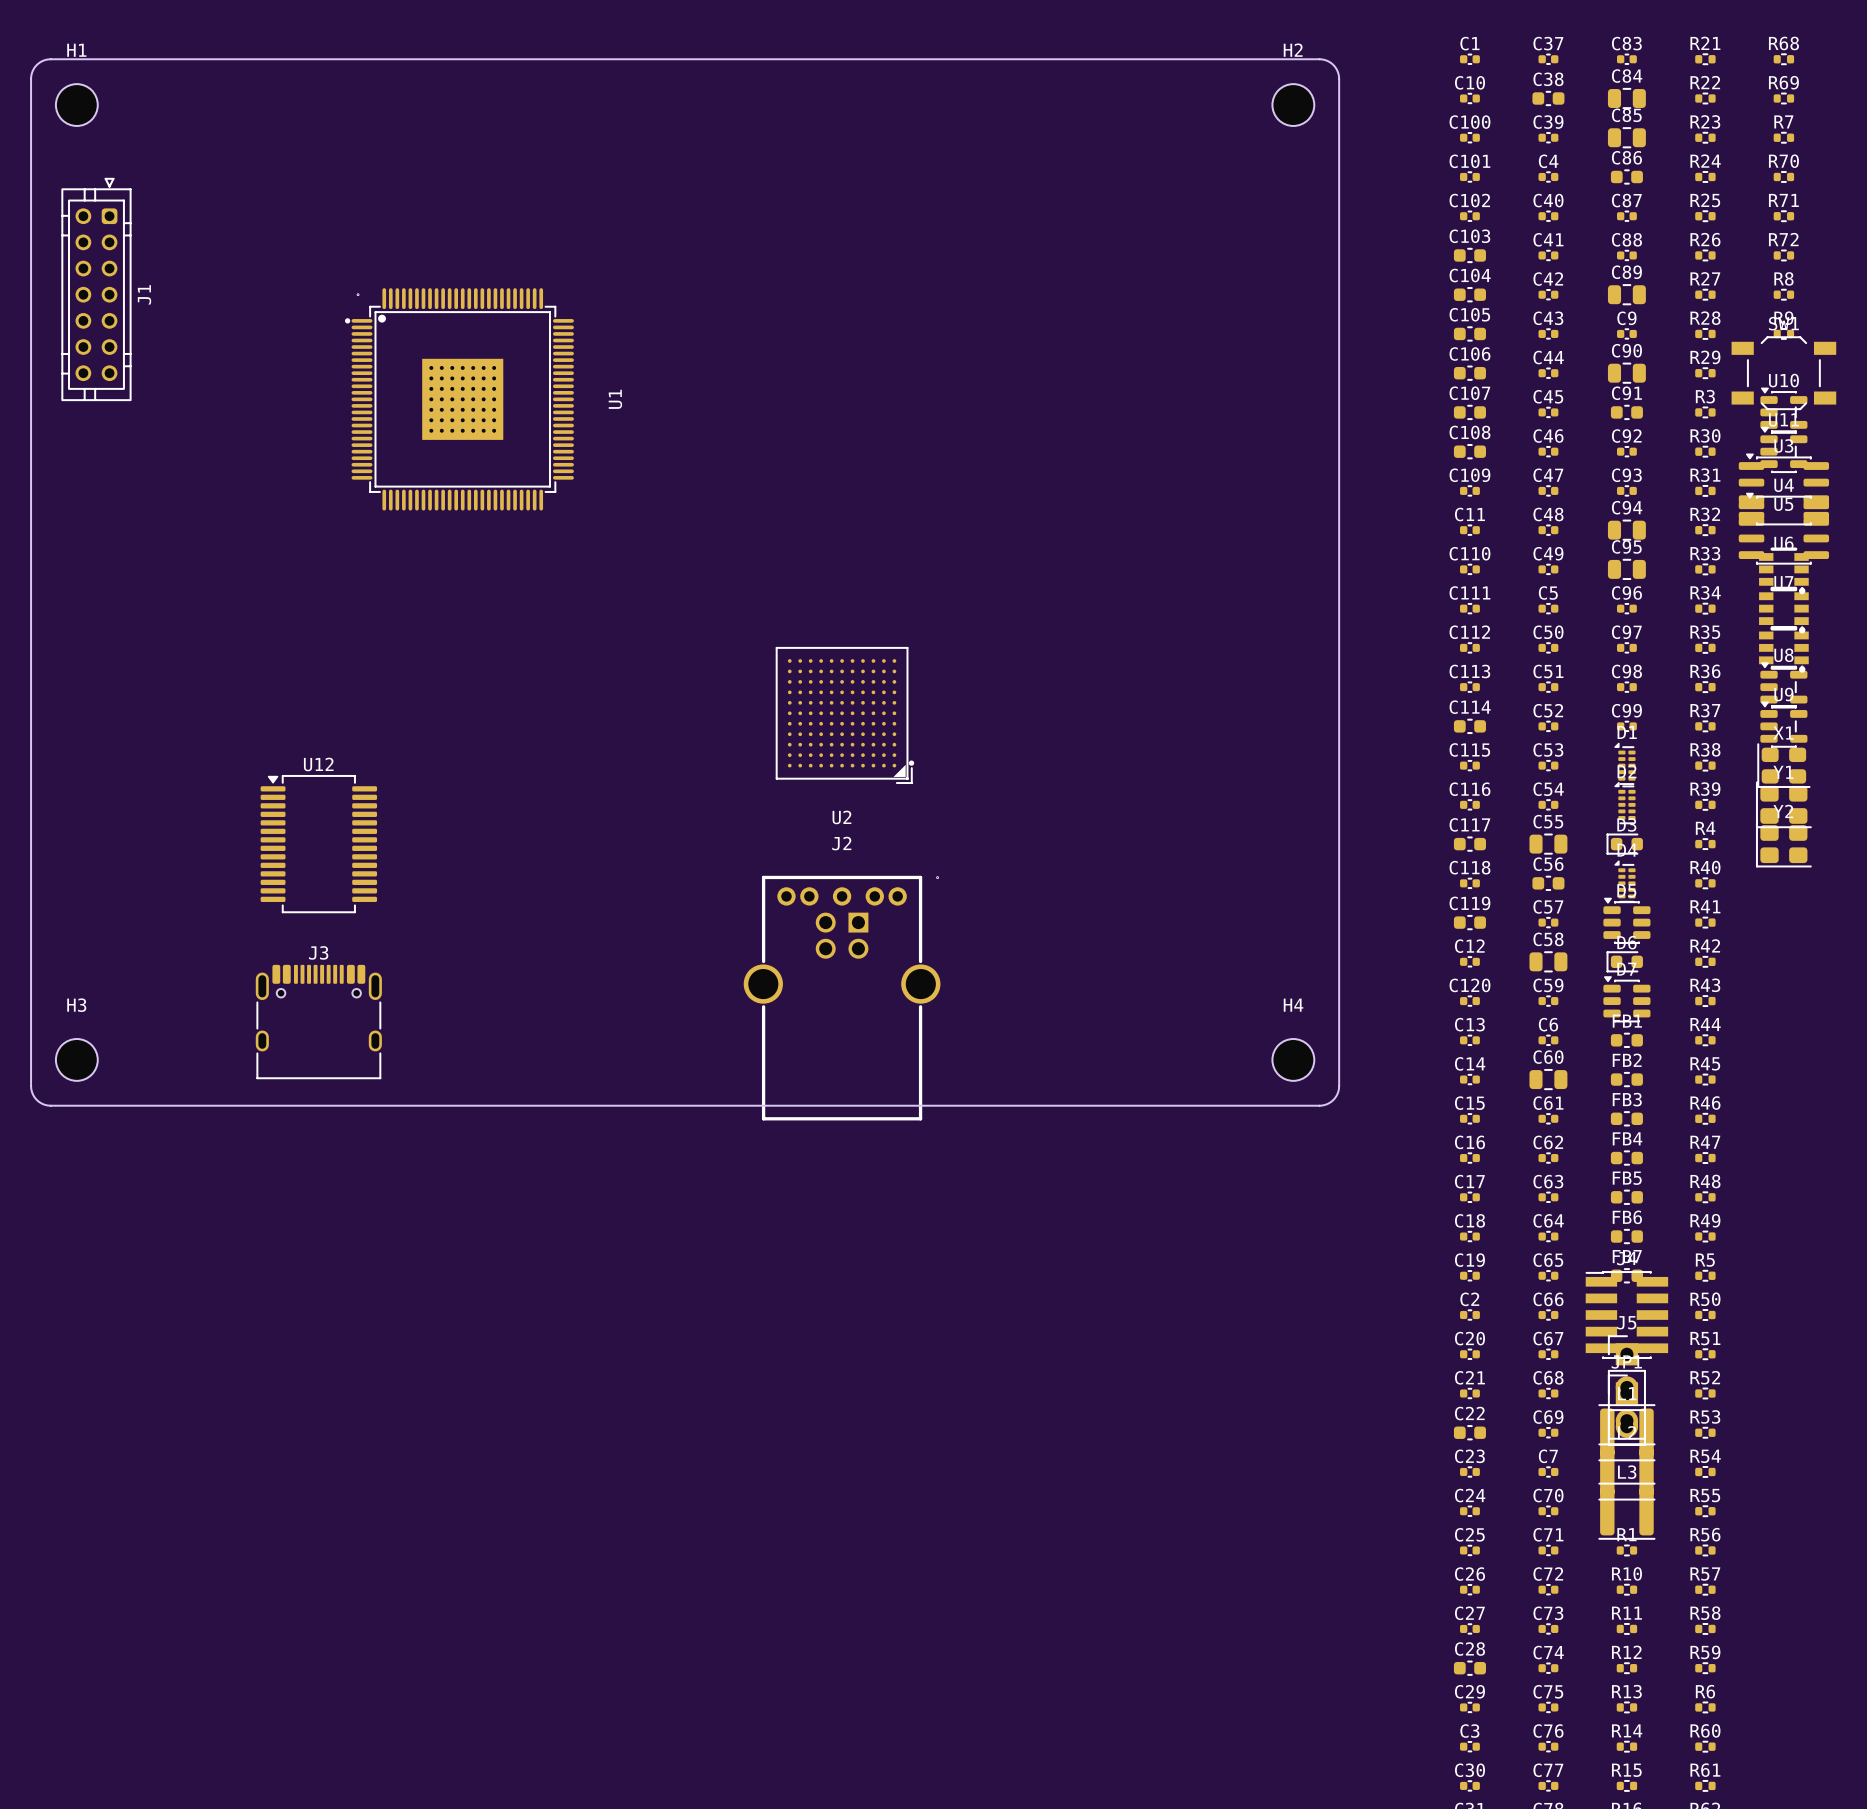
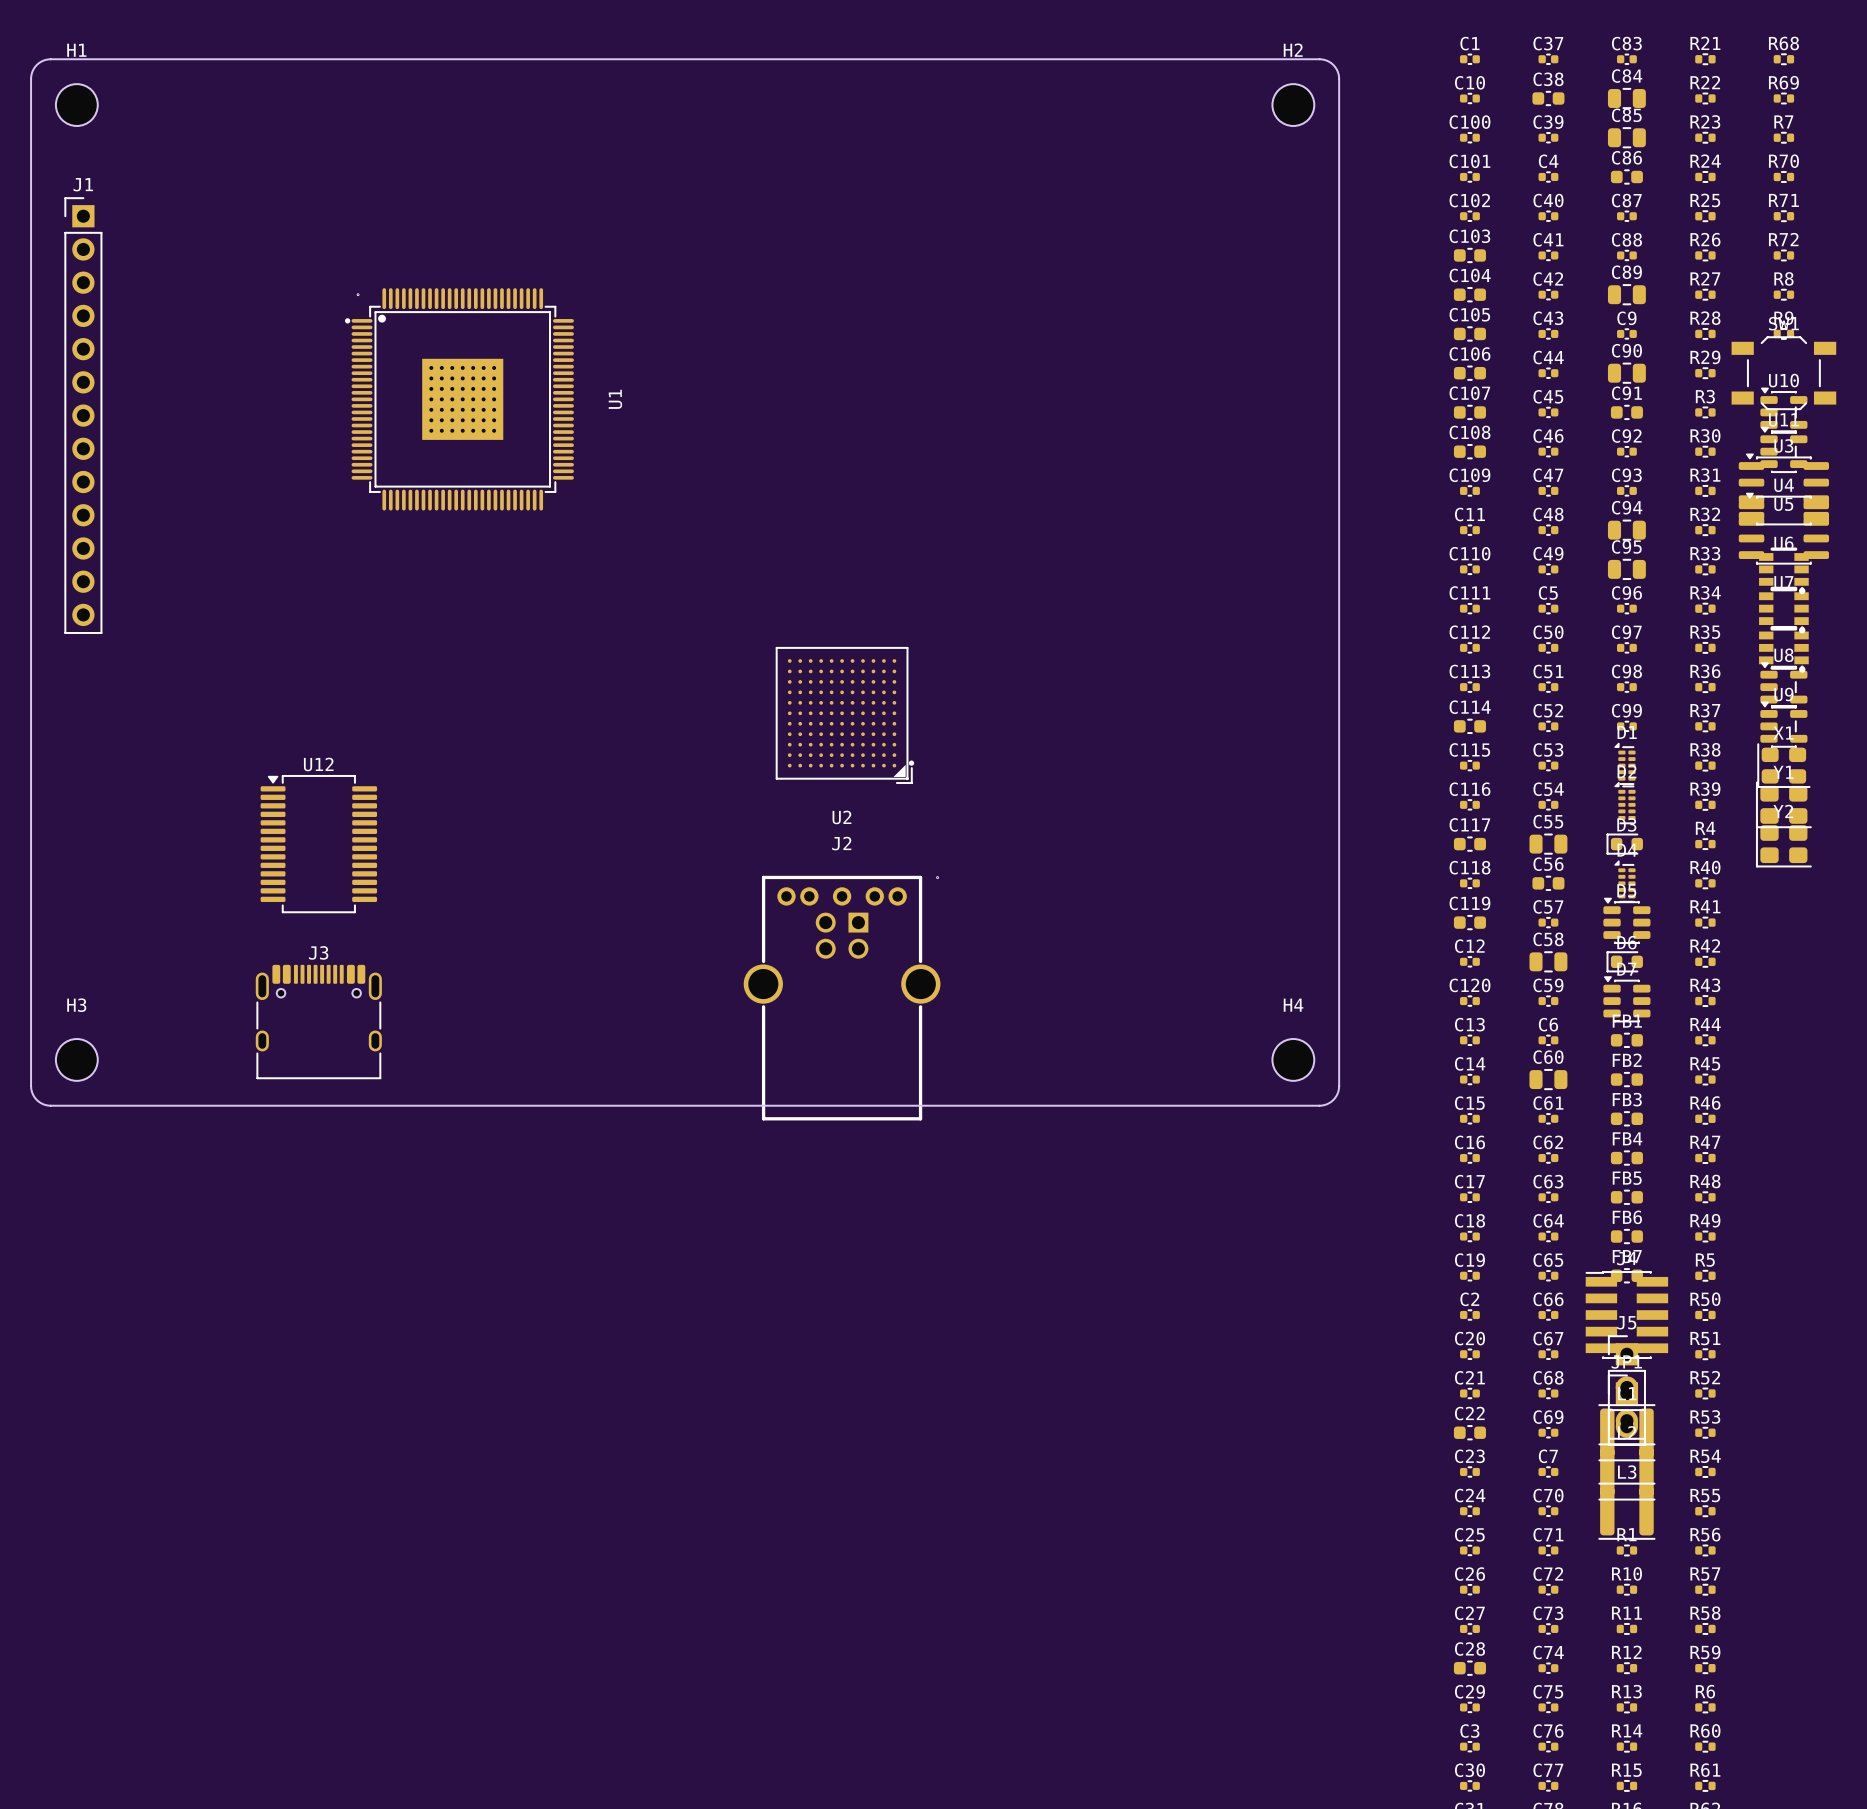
J1 footprint: [61, 178, 132, 401] -> [64, 197, 103, 634]
J1 name position: J1 (144, 294) -> J1 (83, 184)

